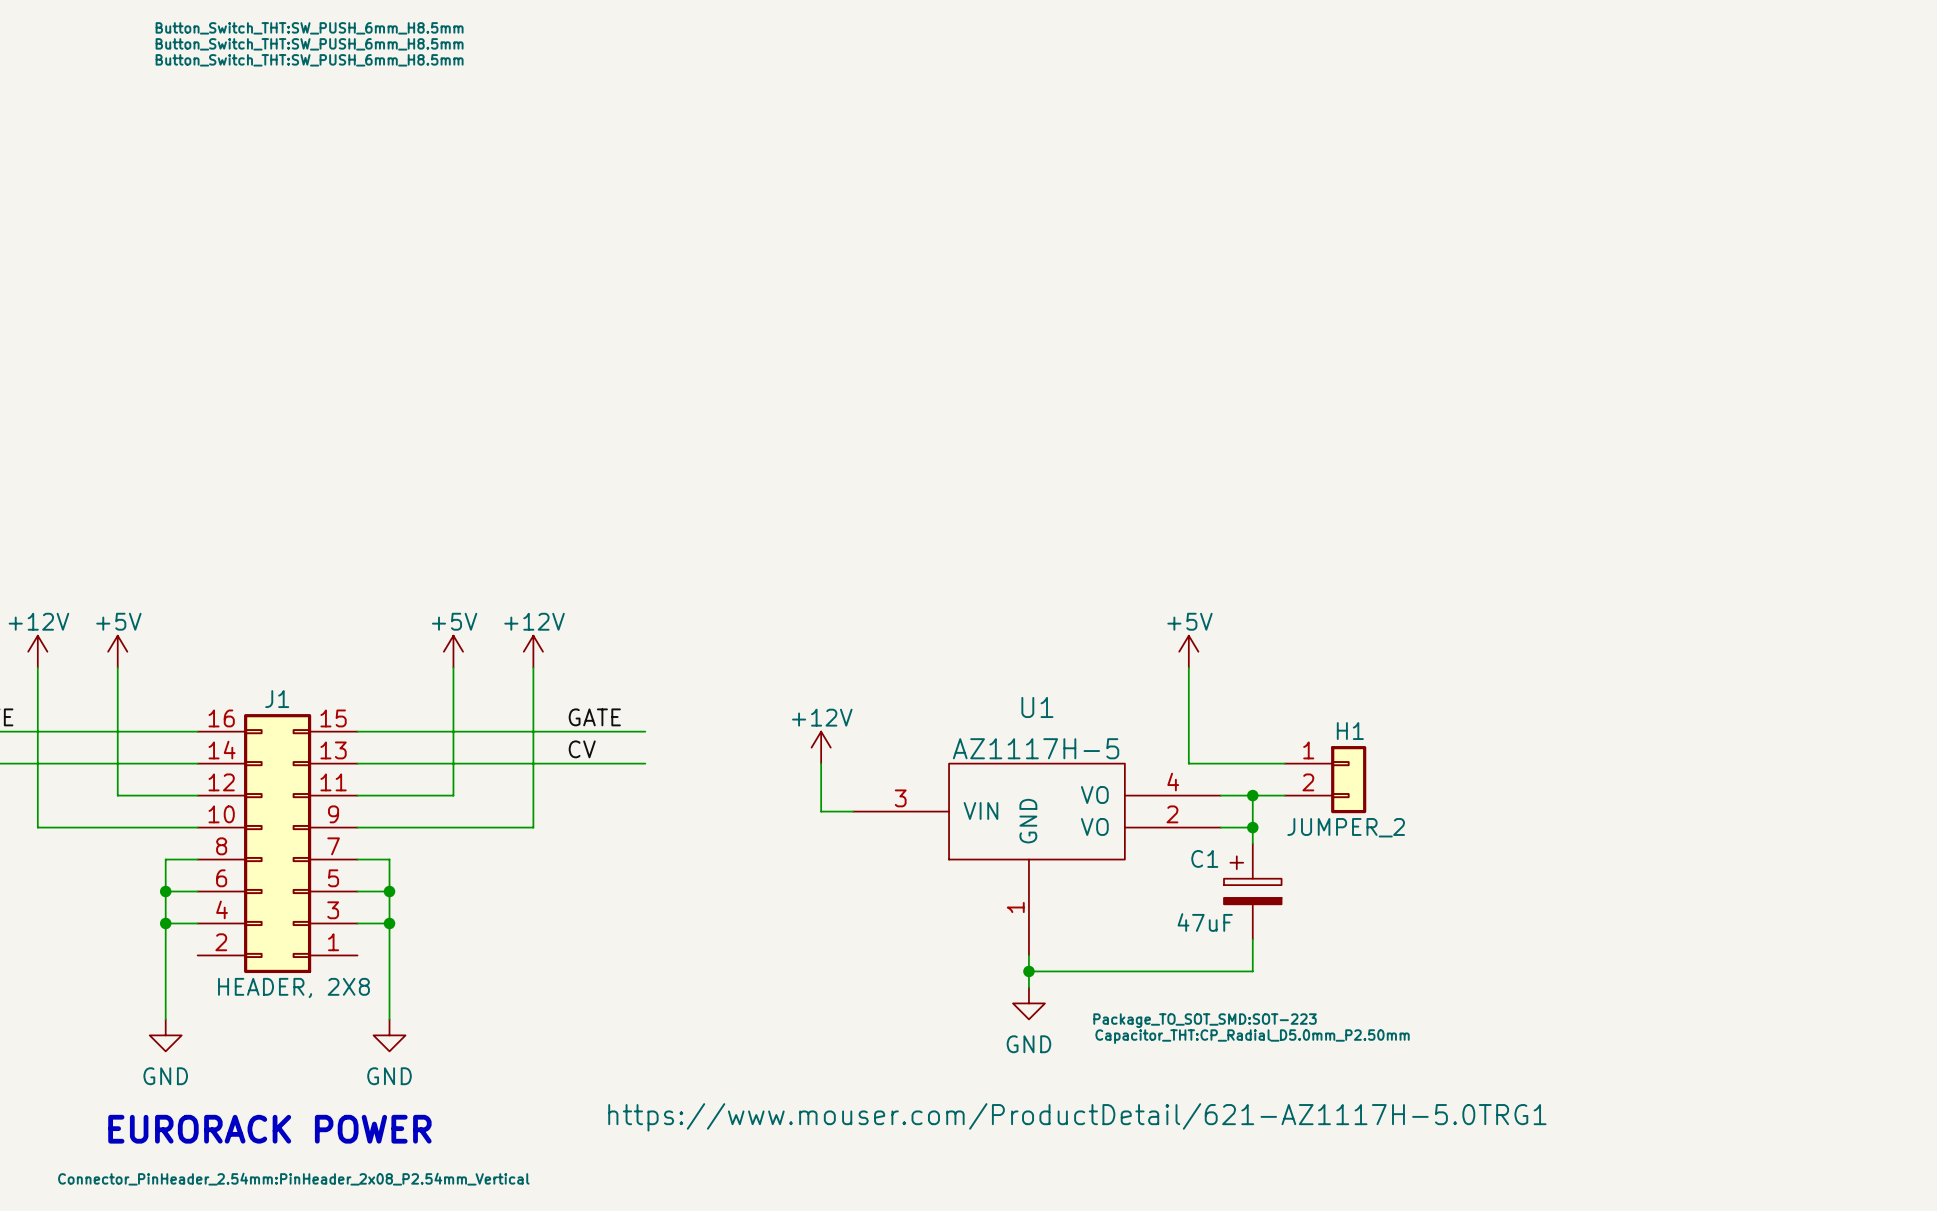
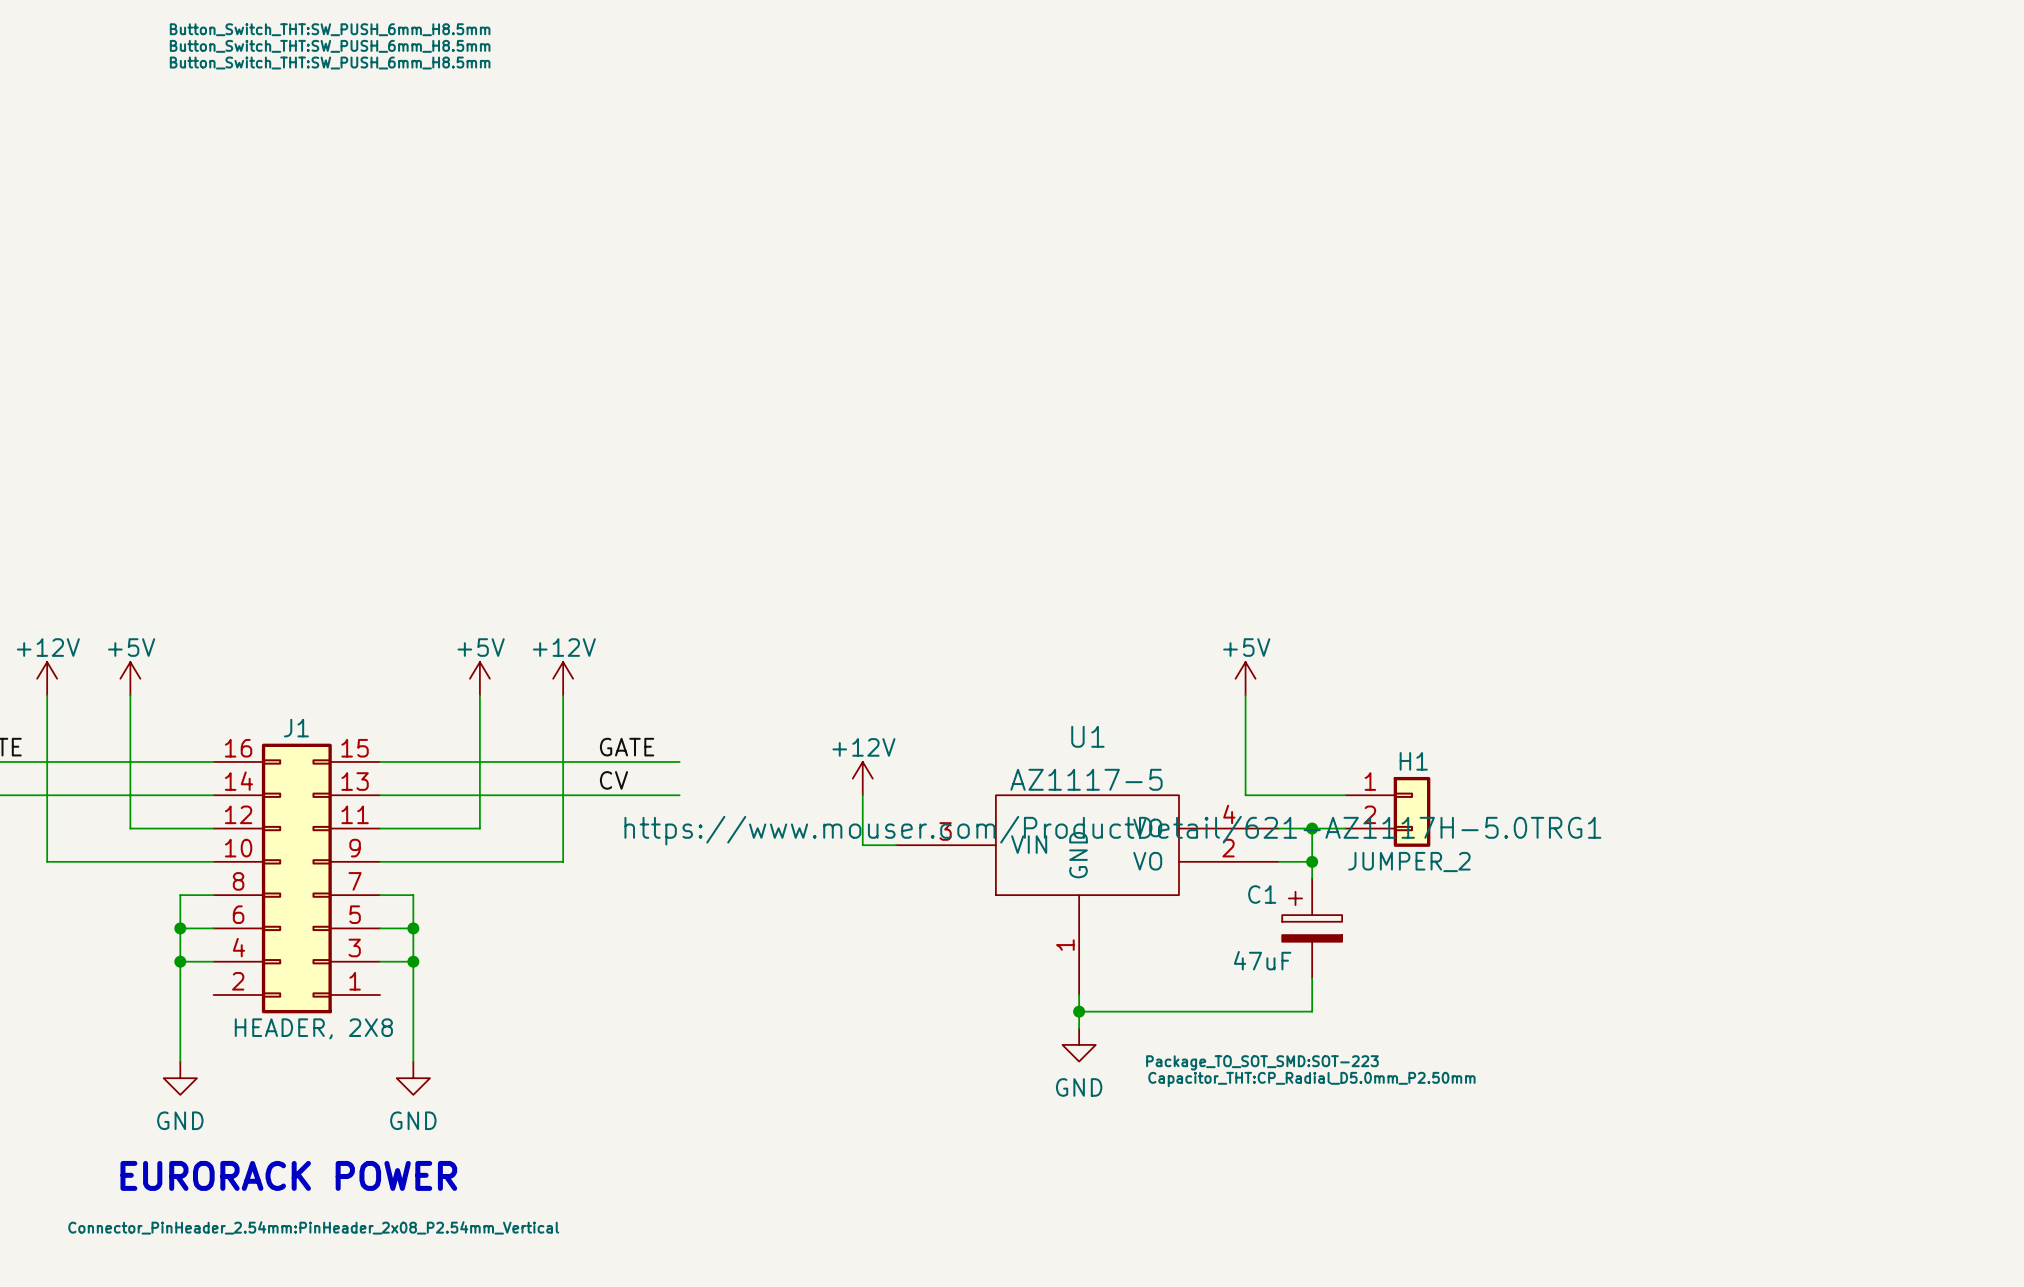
U1 value: AZ1117H-5 (1036, 748) -> AZ1117-5 (1086, 779)
U1 text position: https://www.mouser.com/ProductDetail/621-AZ1117H-5.0TRG1 (1077, 1117) -> https://www.mouser.com/ProductDetail/621-AZ1117H-5.0TRG1 (1112, 830)

